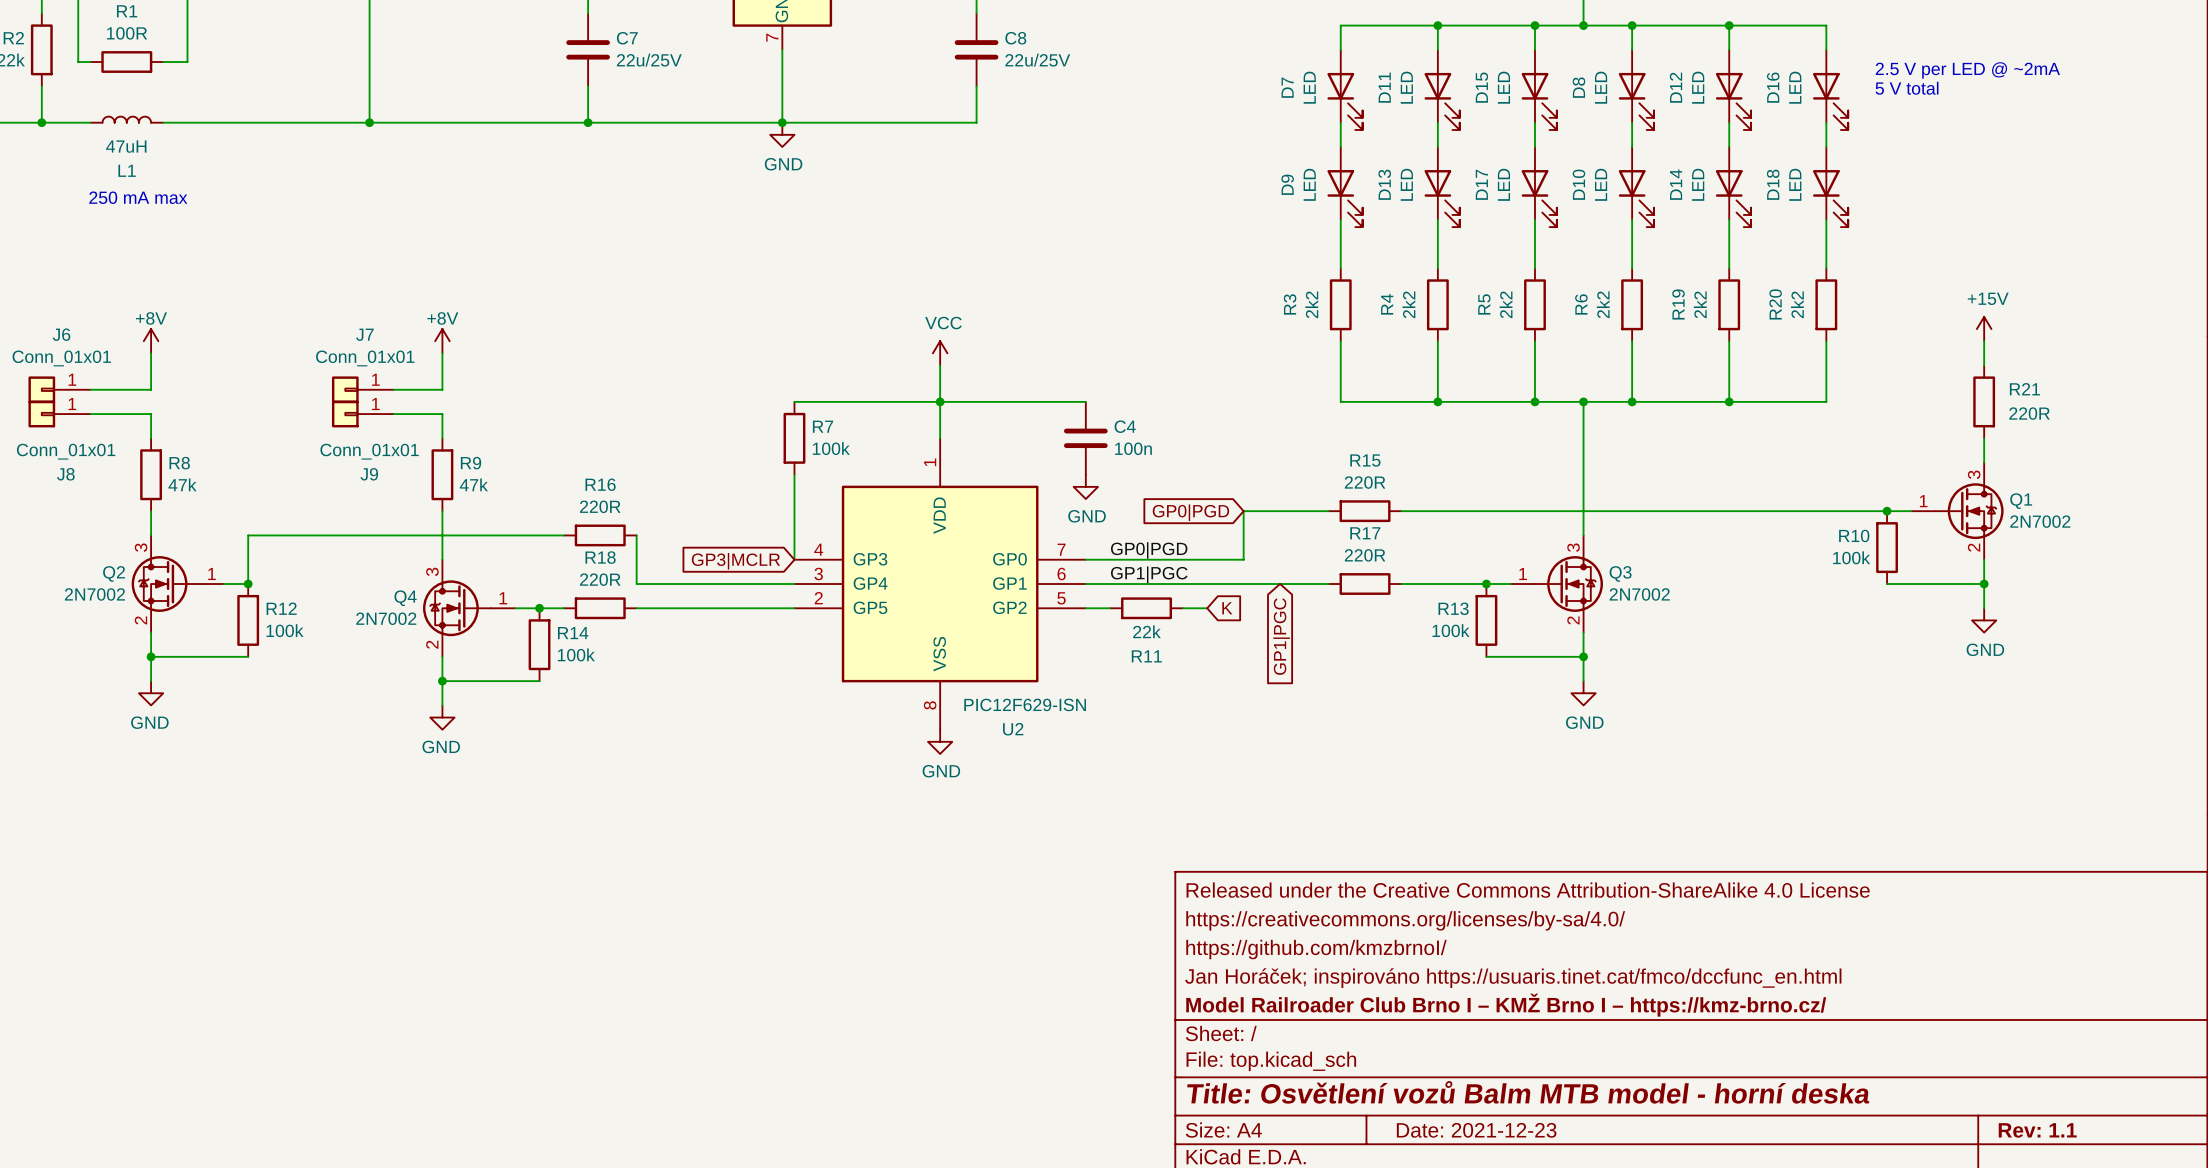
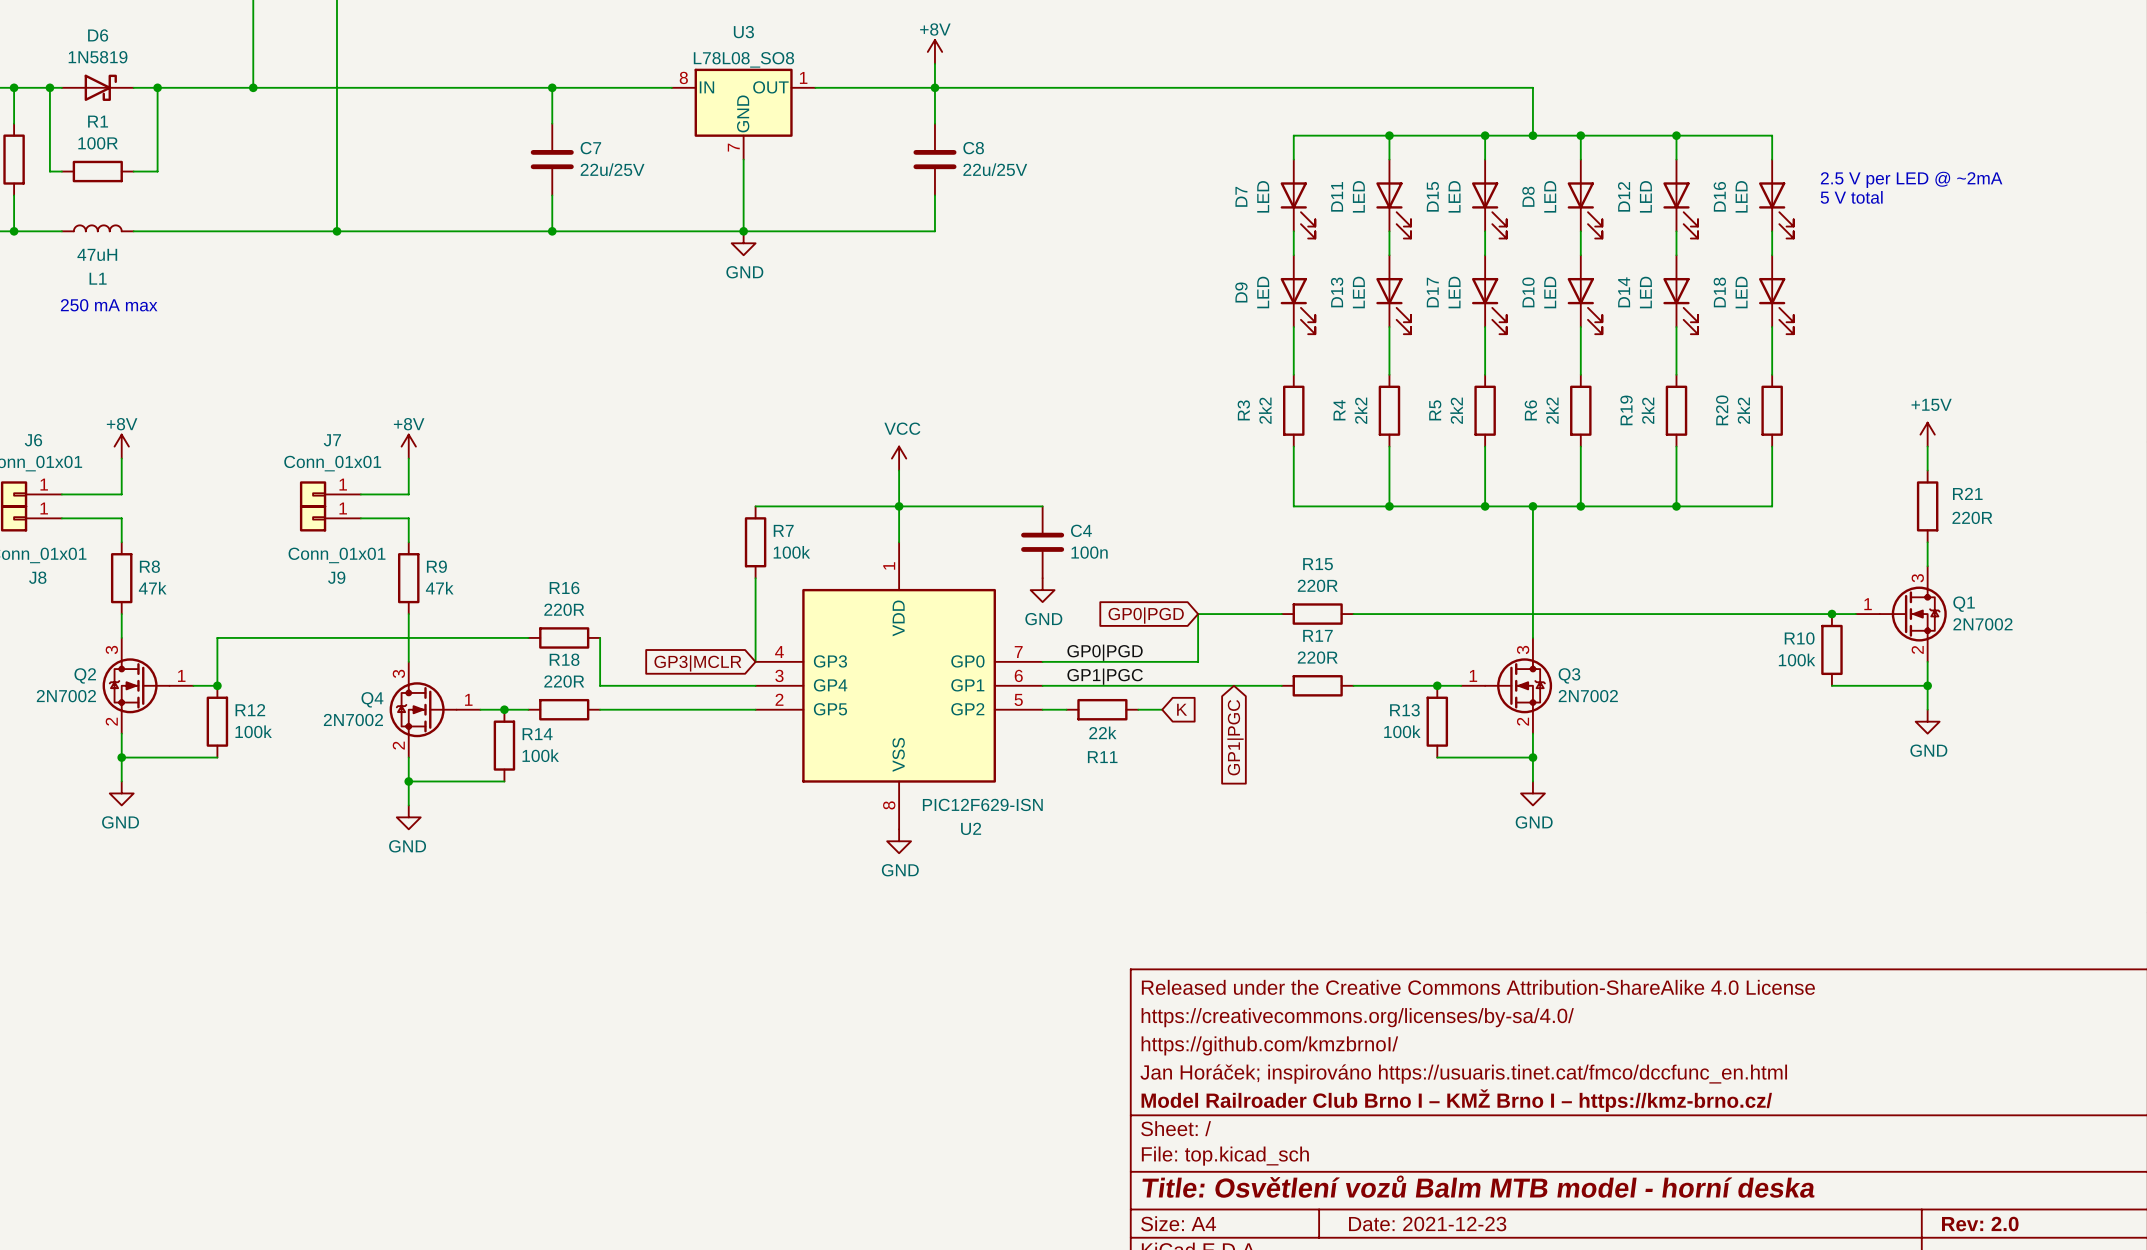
title block: Rev: 1.1 (2037, 1130) -> Rev: 2.0 (1980, 1224)

